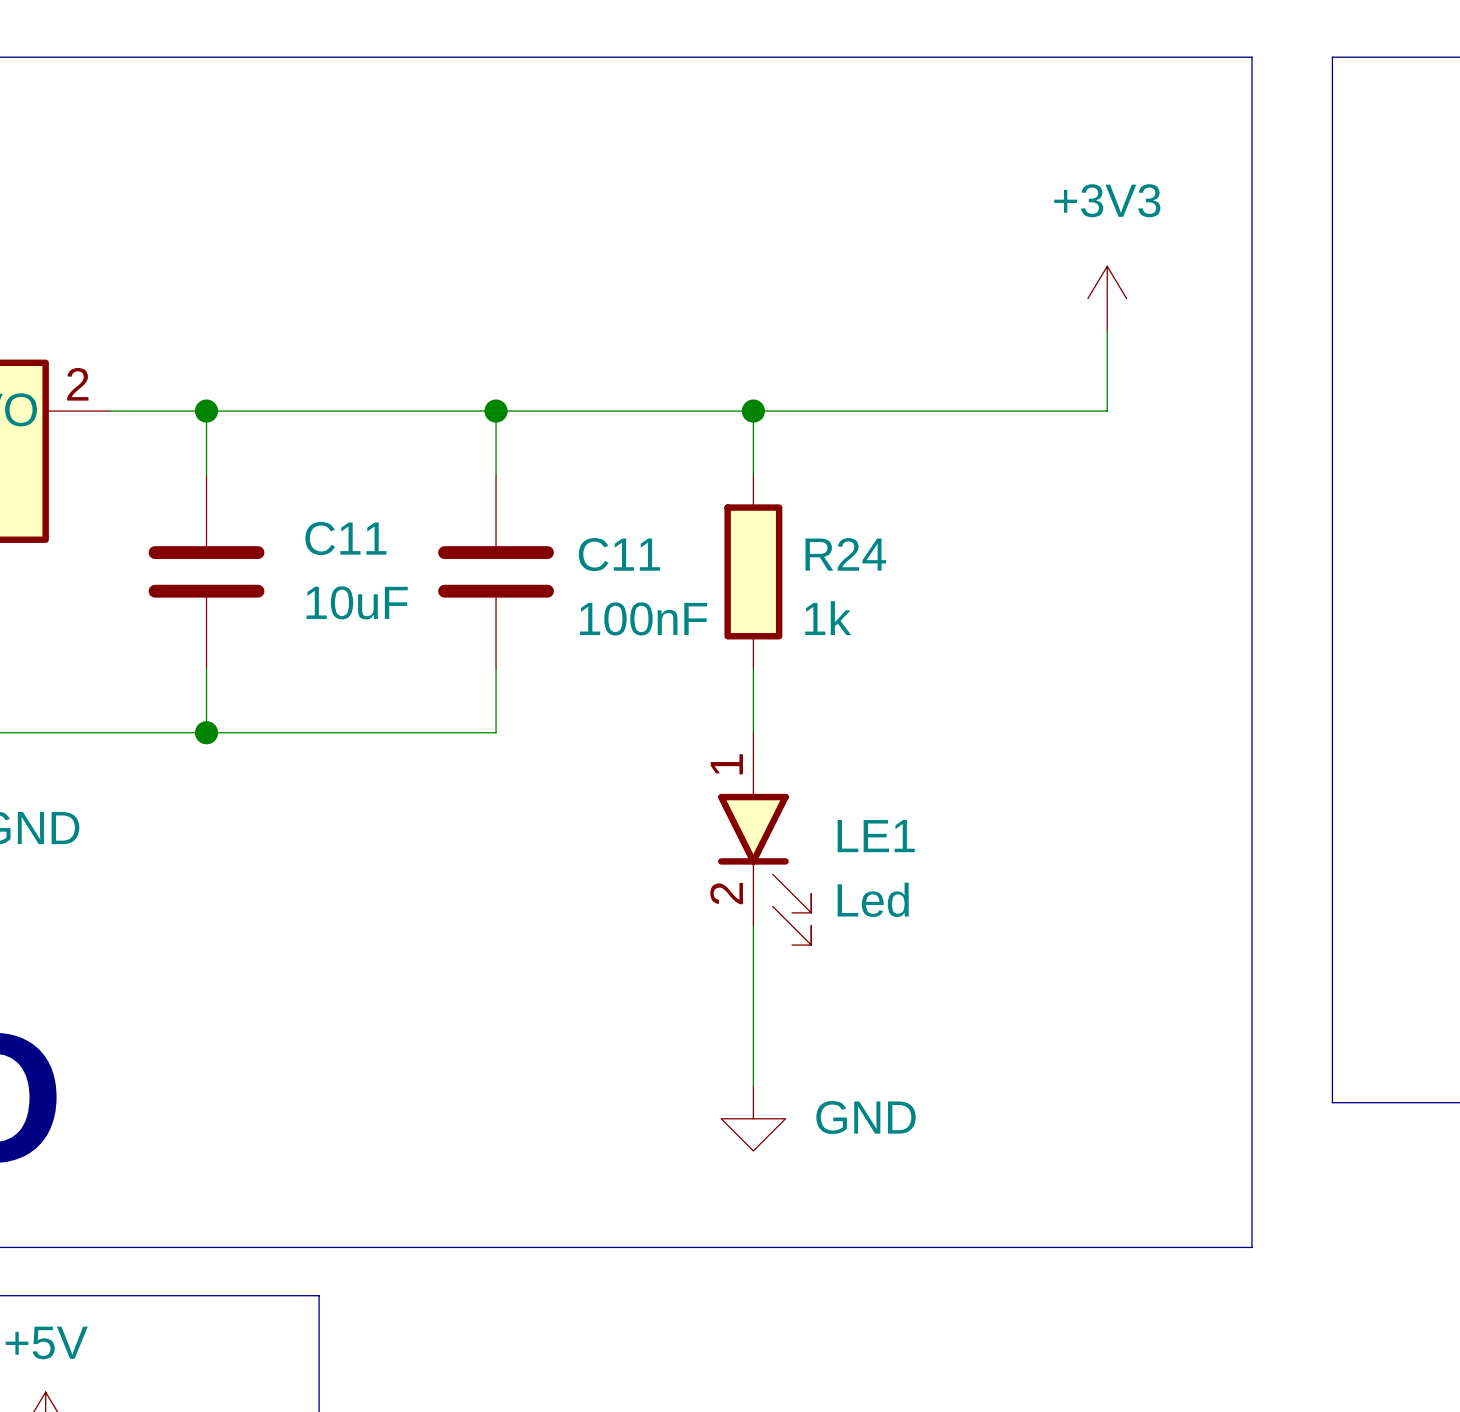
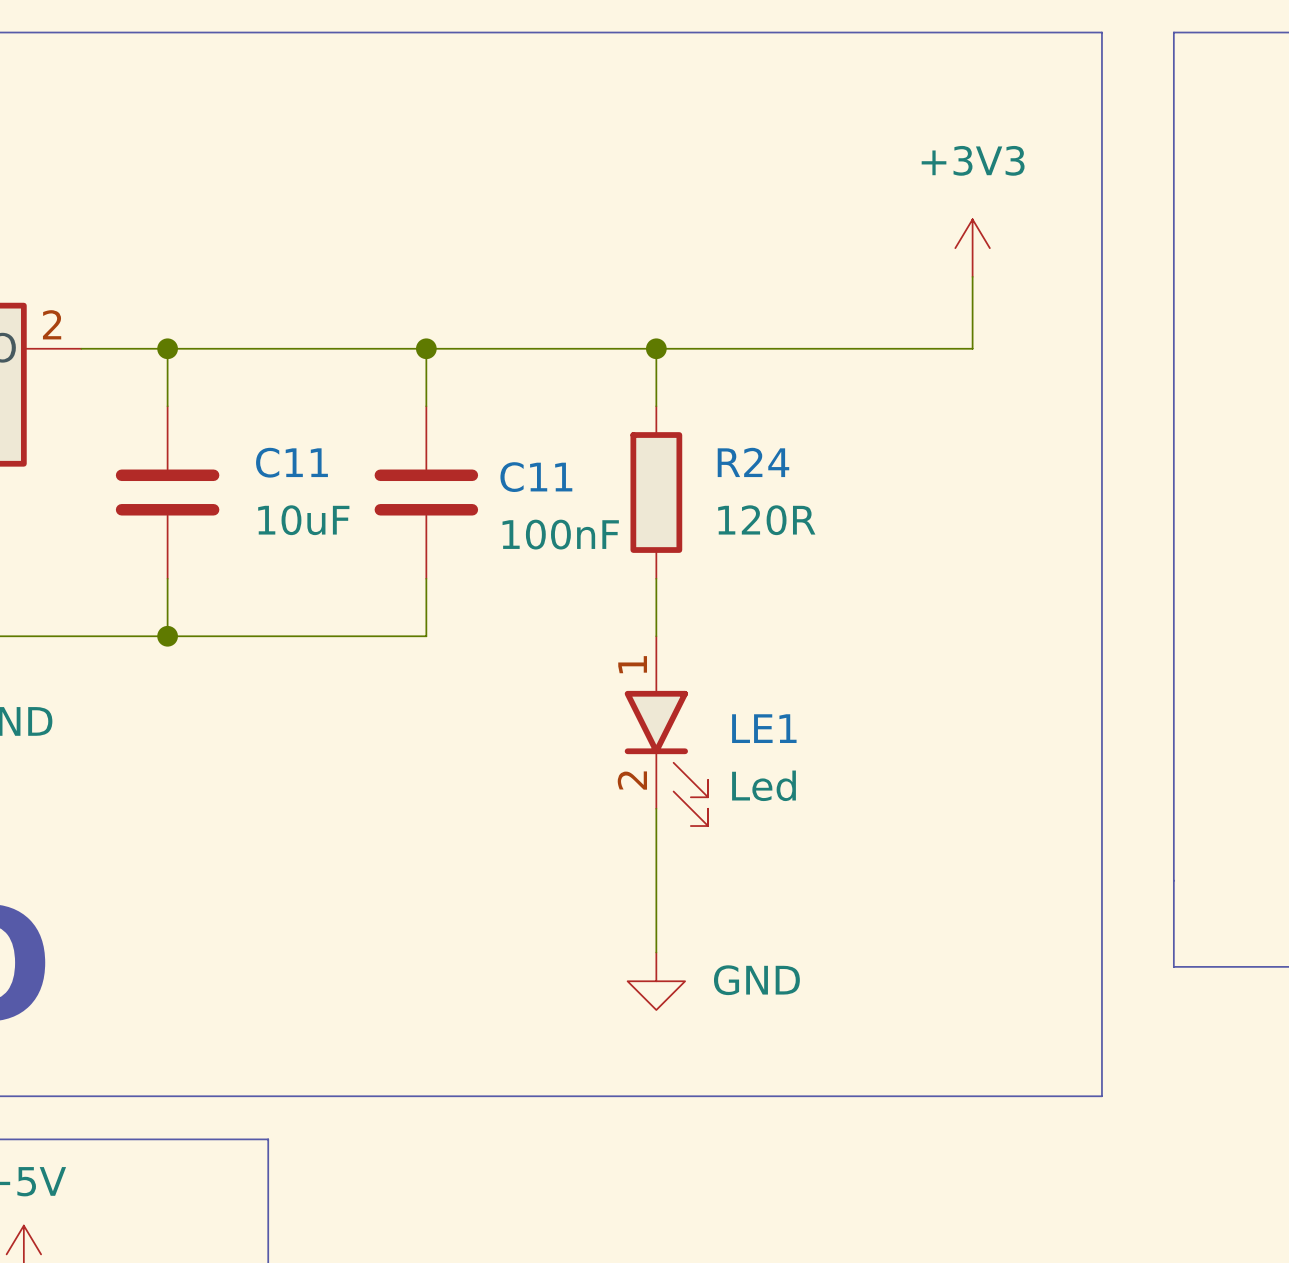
R24 name position: R24 (845, 554) -> R24 (753, 462)
R24 value: 1k (828, 618) -> 120R (766, 520)

